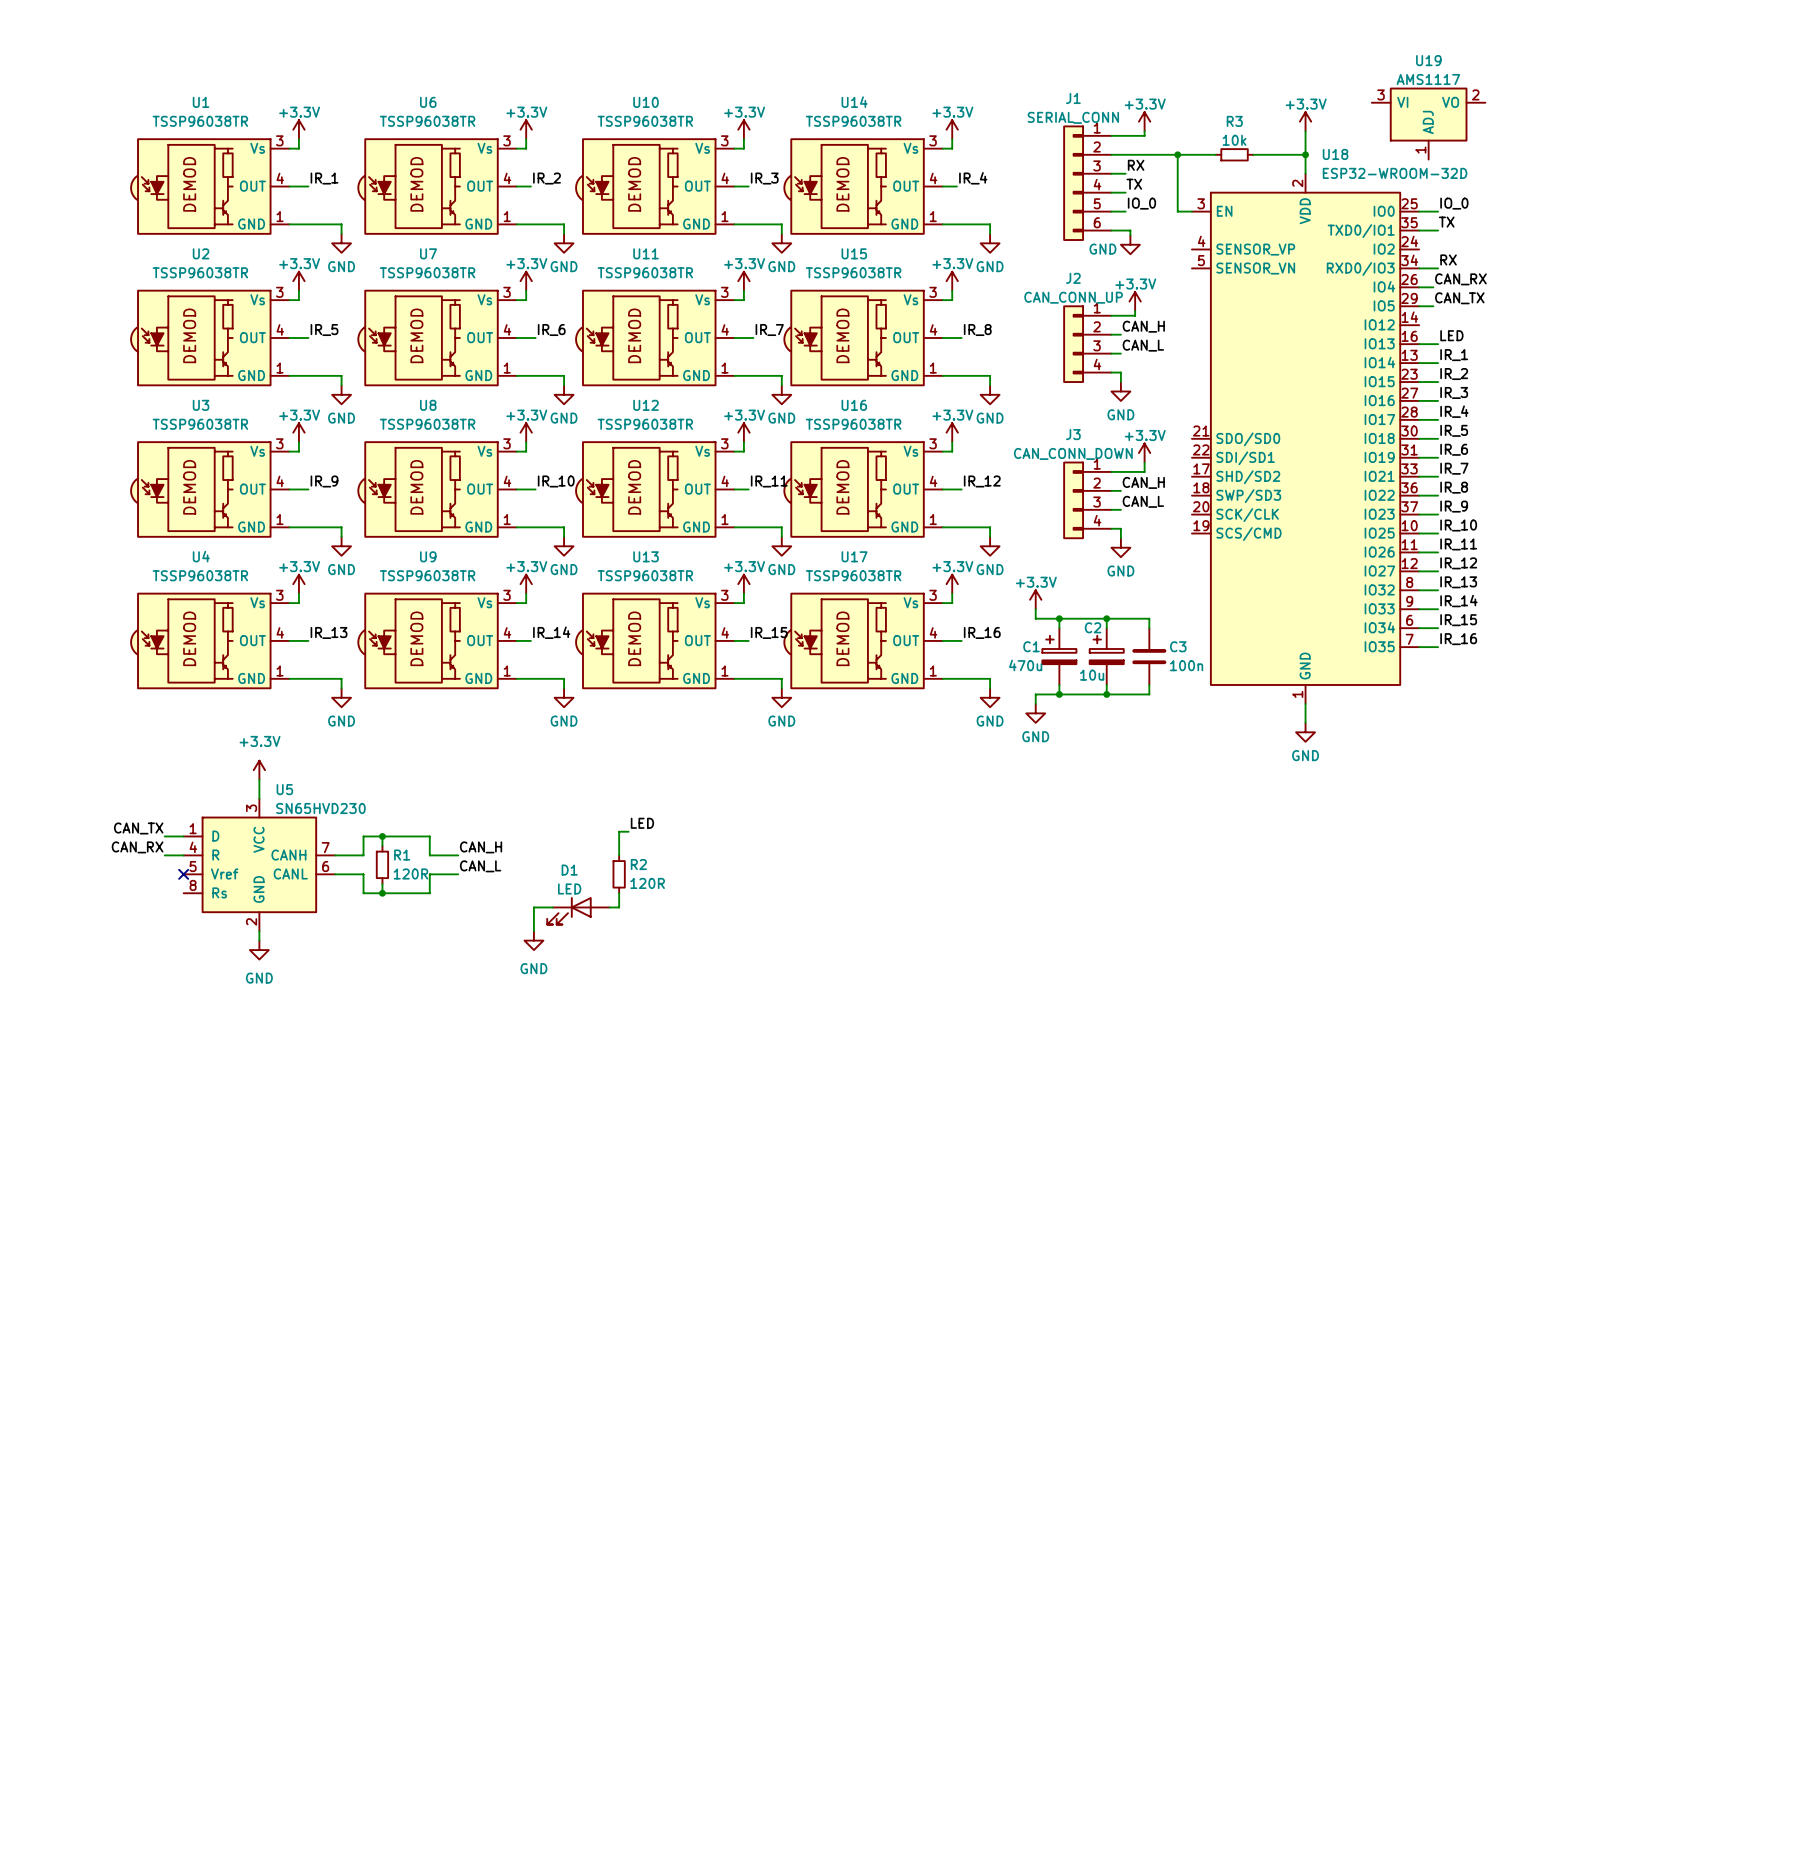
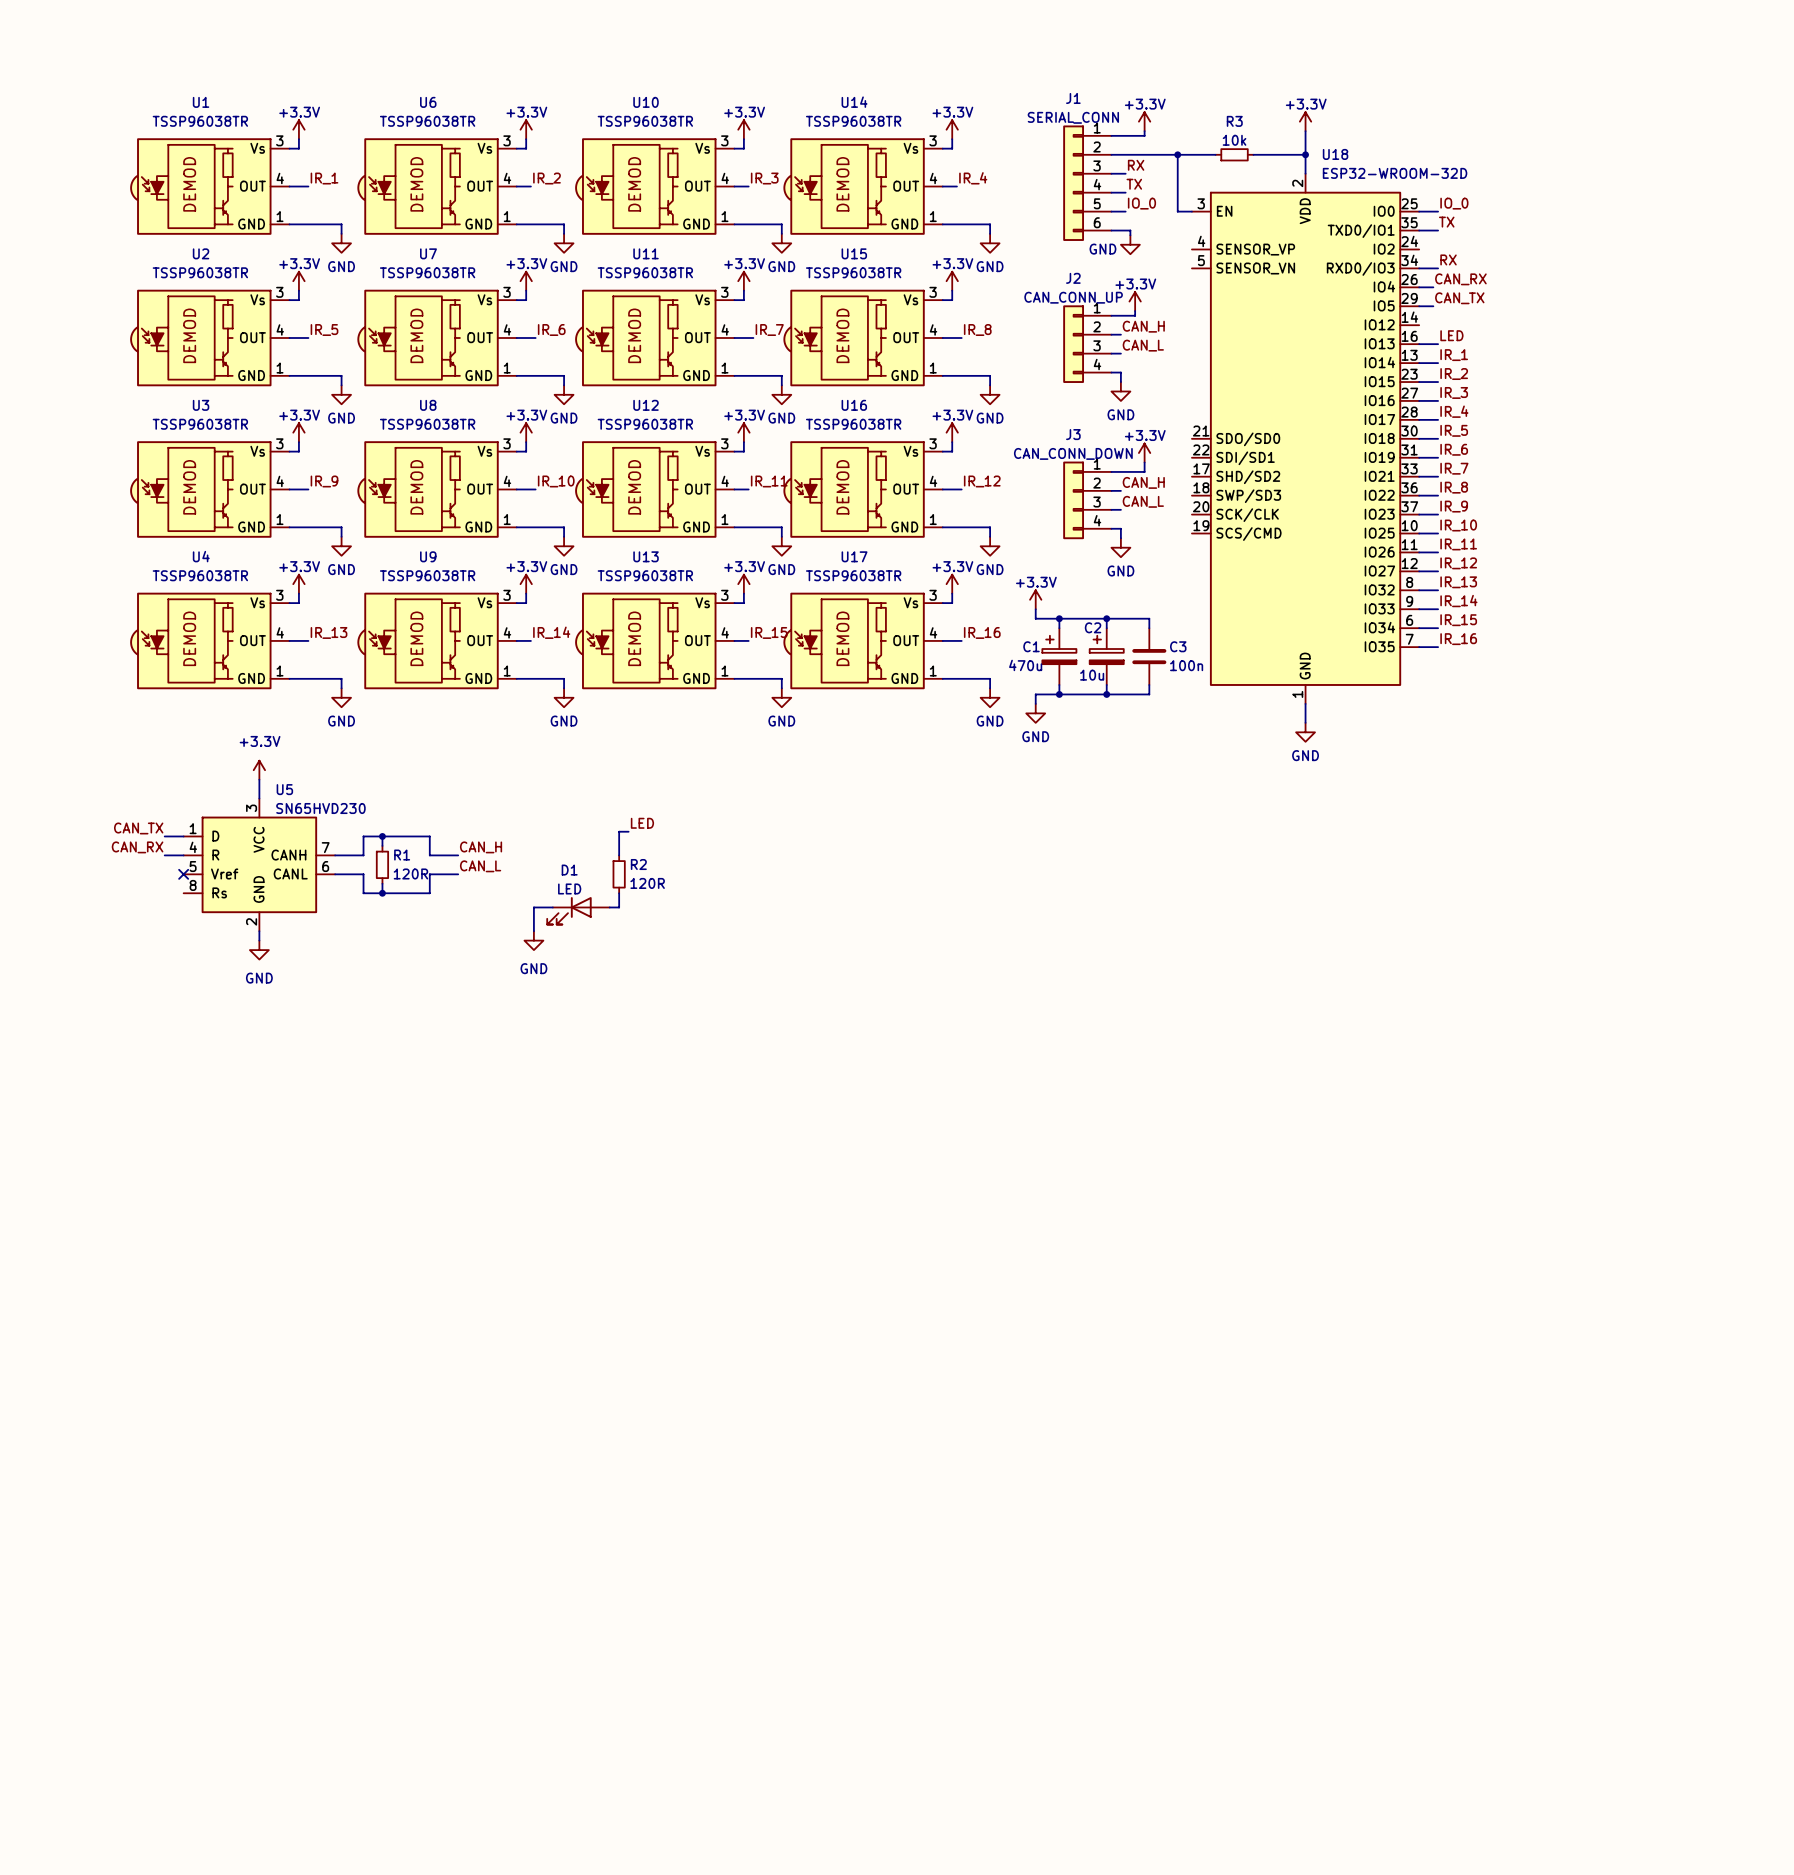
U19: AMS1117 (1428, 123) -> none

